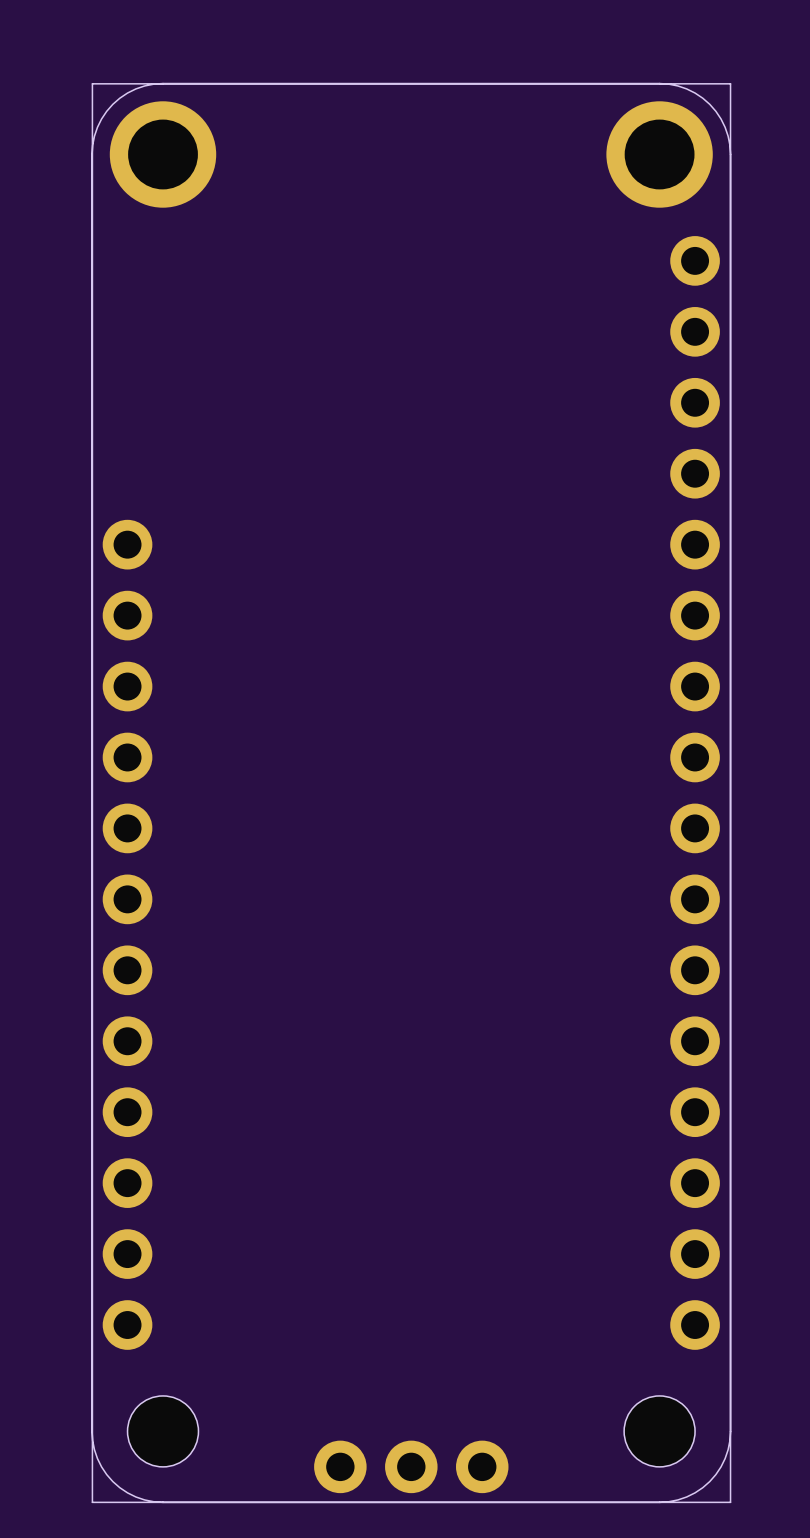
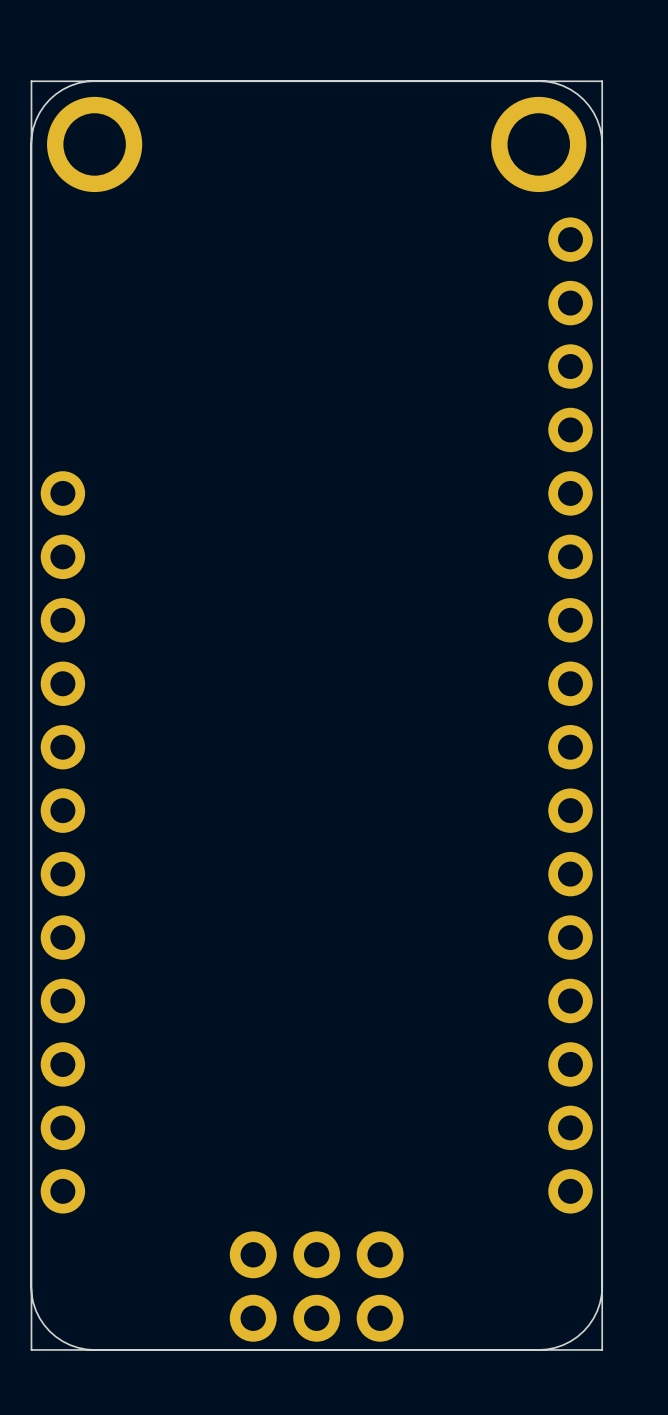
part footprint: [92, 83, 731, 1503] -> [31, 81, 603, 1350]
part: none -> (316, 1254)

